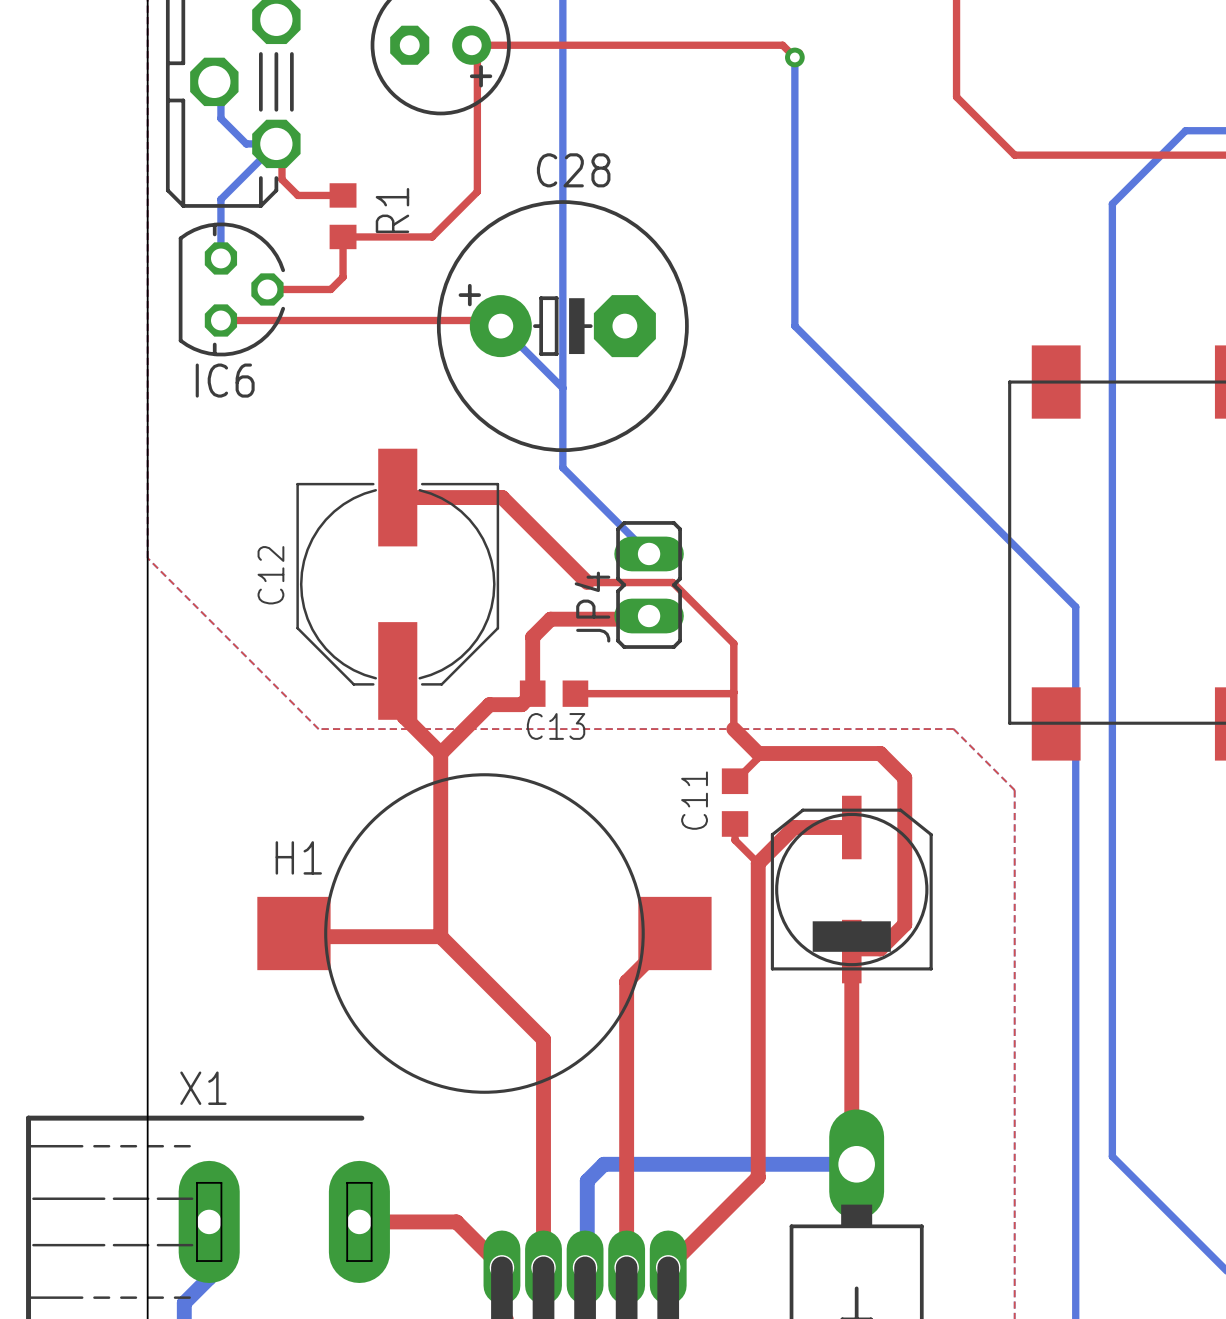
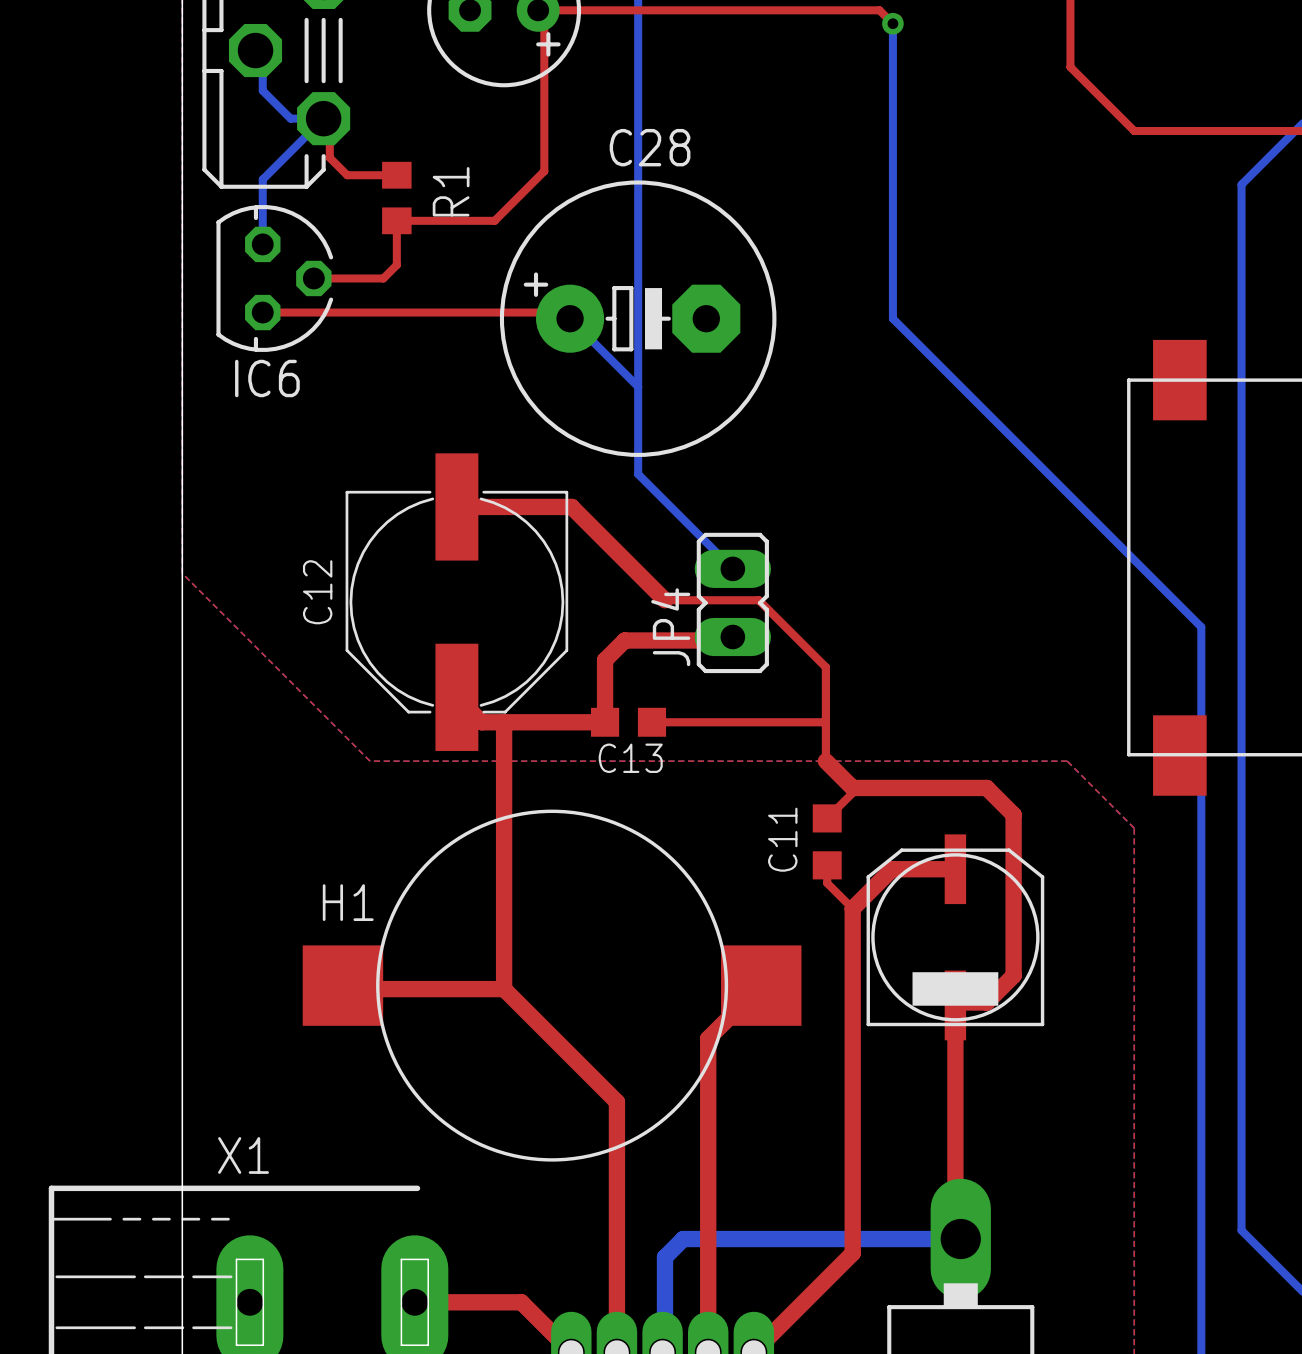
top track: (404, 677) (404, 716) (440, 753) (489, 704) (521, 704) (532, 693) -> (463, 704) (481, 722) (605, 722)
top track: none -> (504, 722) (504, 787)

